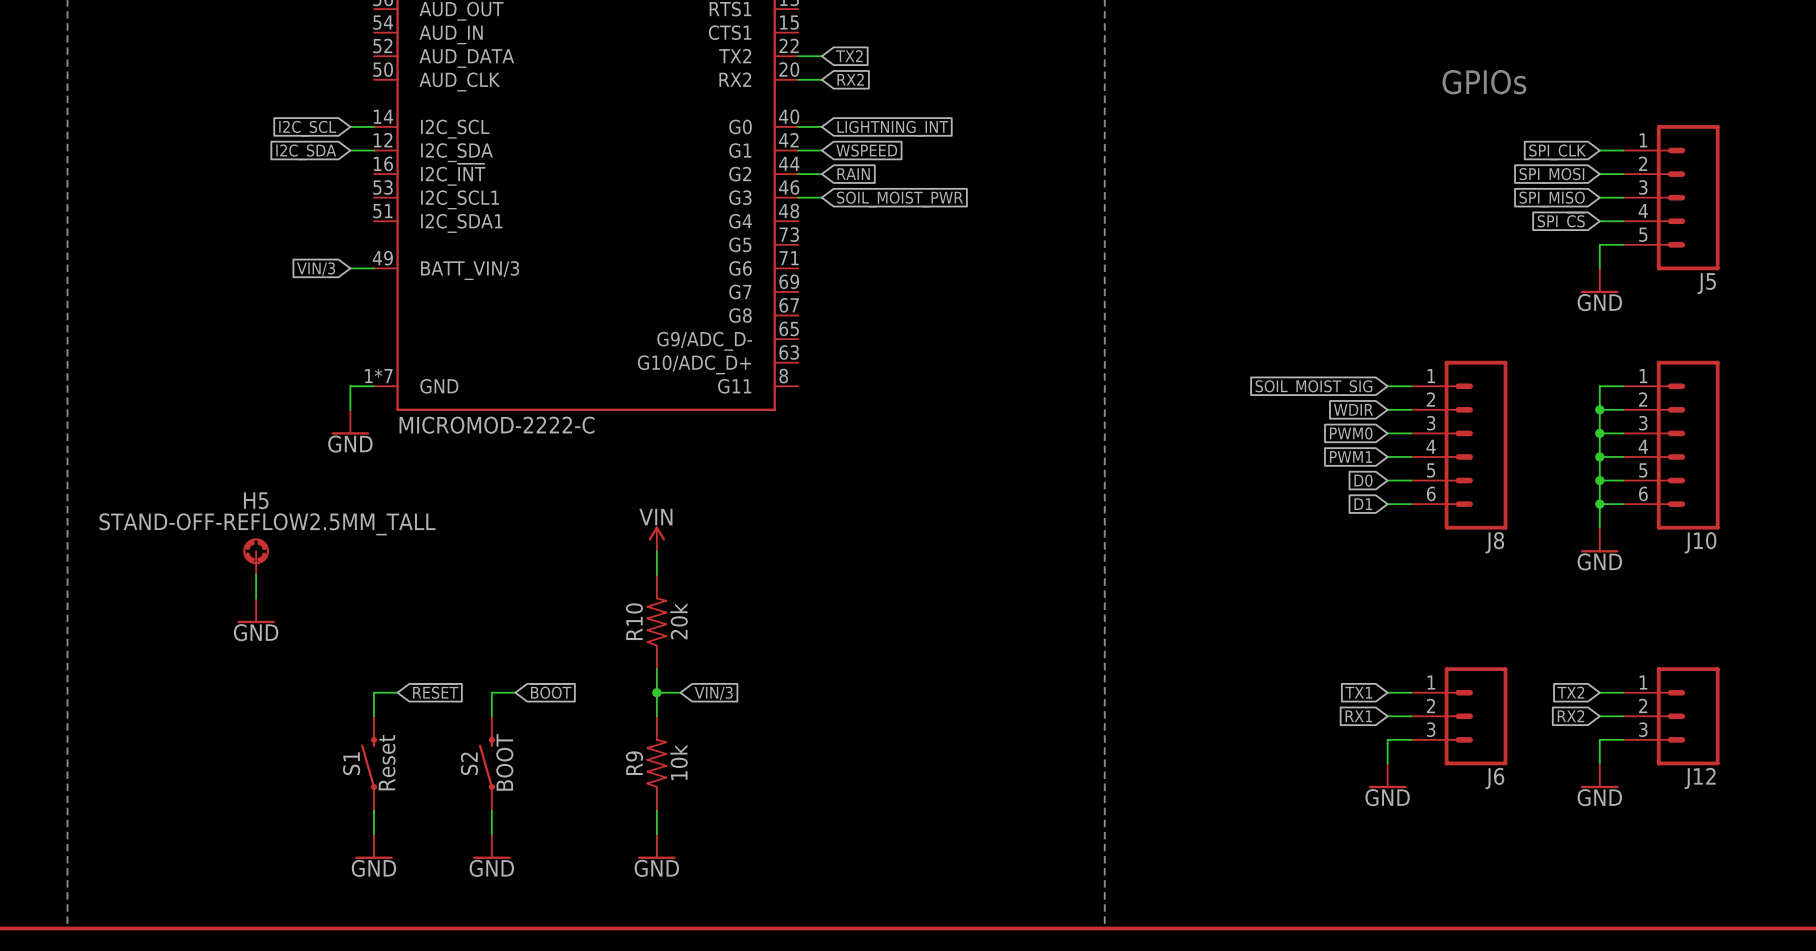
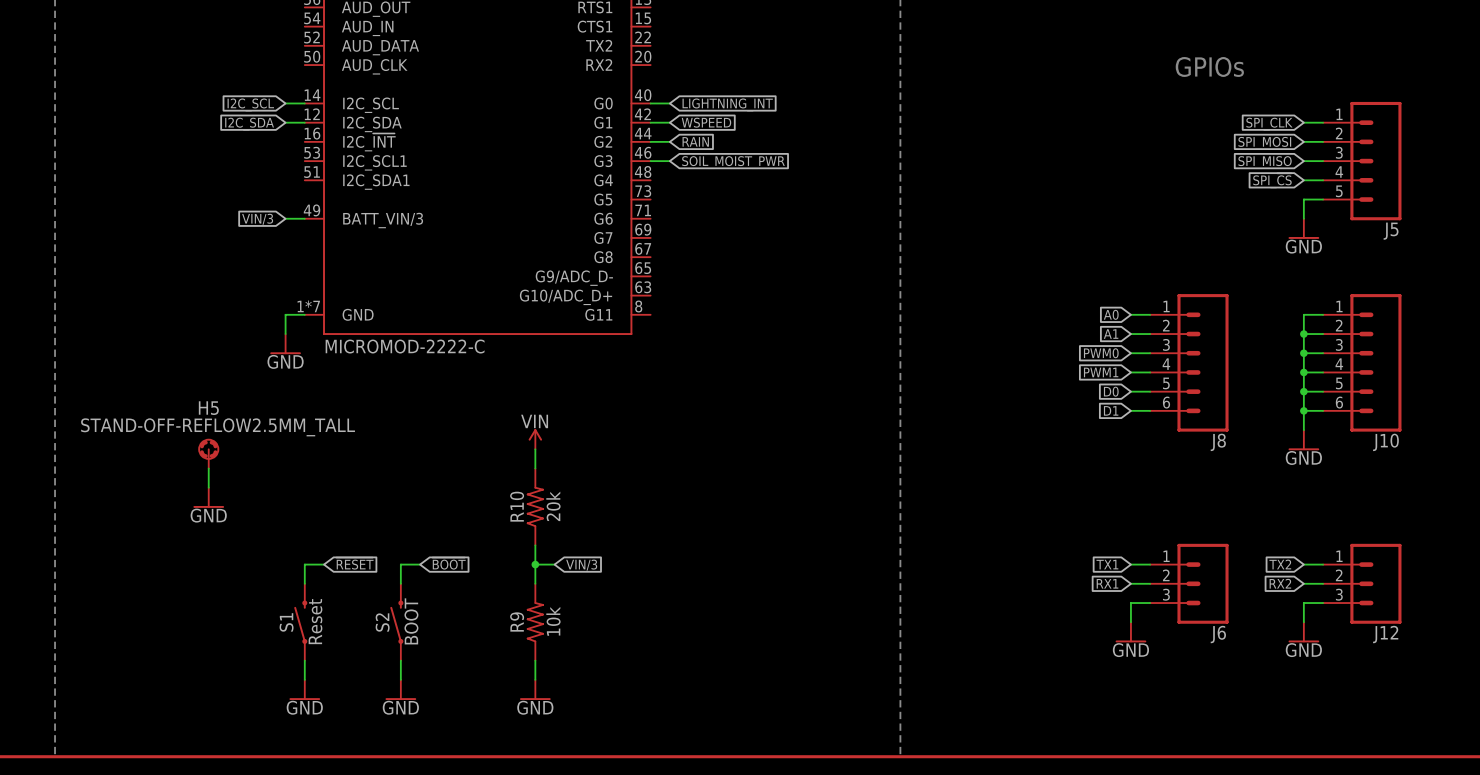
wire: (798, 56) (821, 56) -> none
global label: TX2 (849, 56) -> none
wire: (798, 79) (821, 79) -> none
global label: RX2 (850, 79) -> none
global label: SOIL_MOIST_SIG (1313, 388) -> A0 (1111, 314)
global label: WDIR (1353, 409) -> A1 (1111, 334)

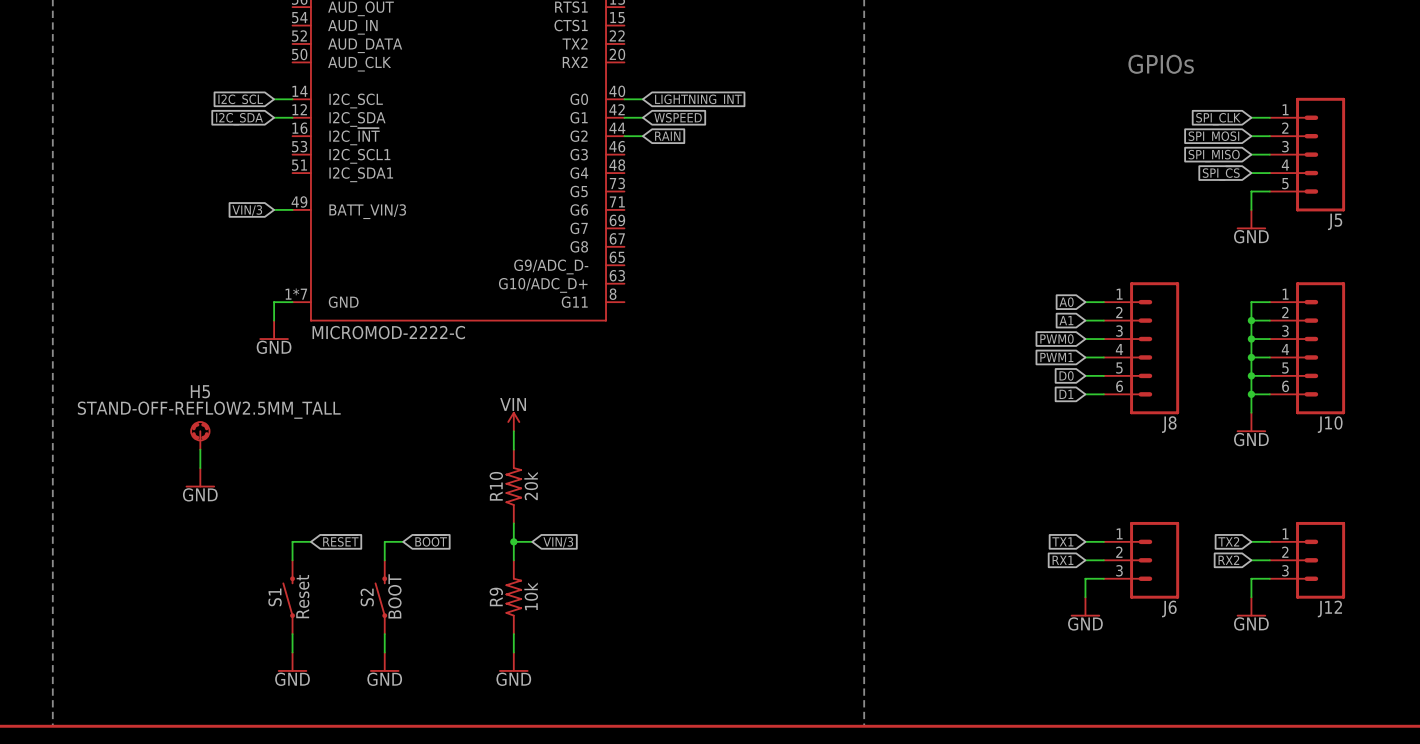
wire: (650, 161) (669, 161) -> none
global label: SOIL_MOIST_PWR (733, 162) -> none

